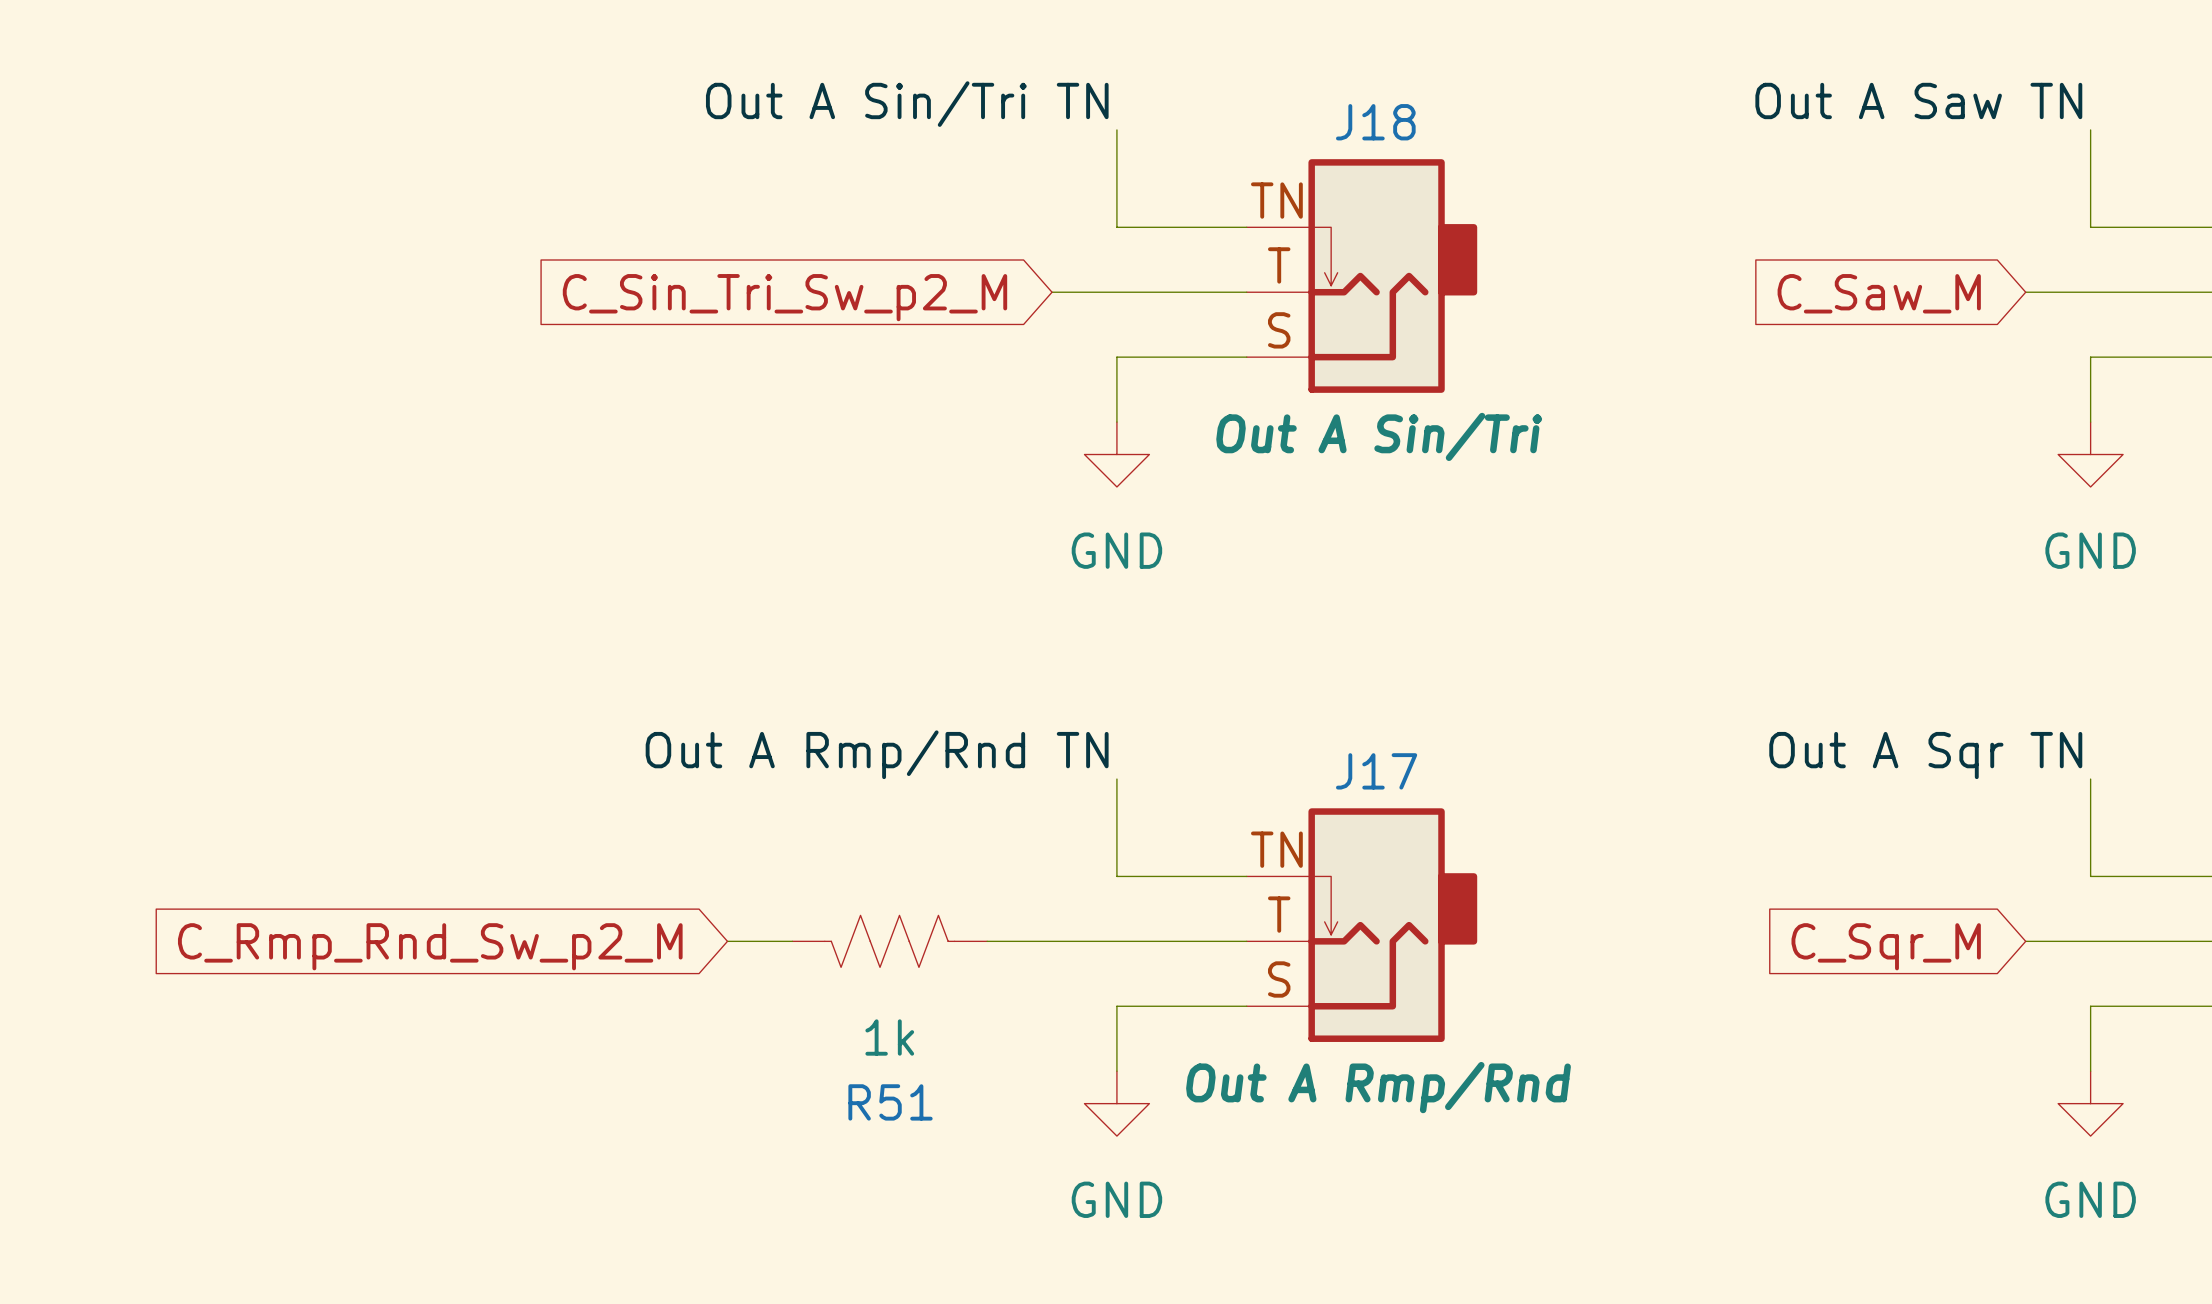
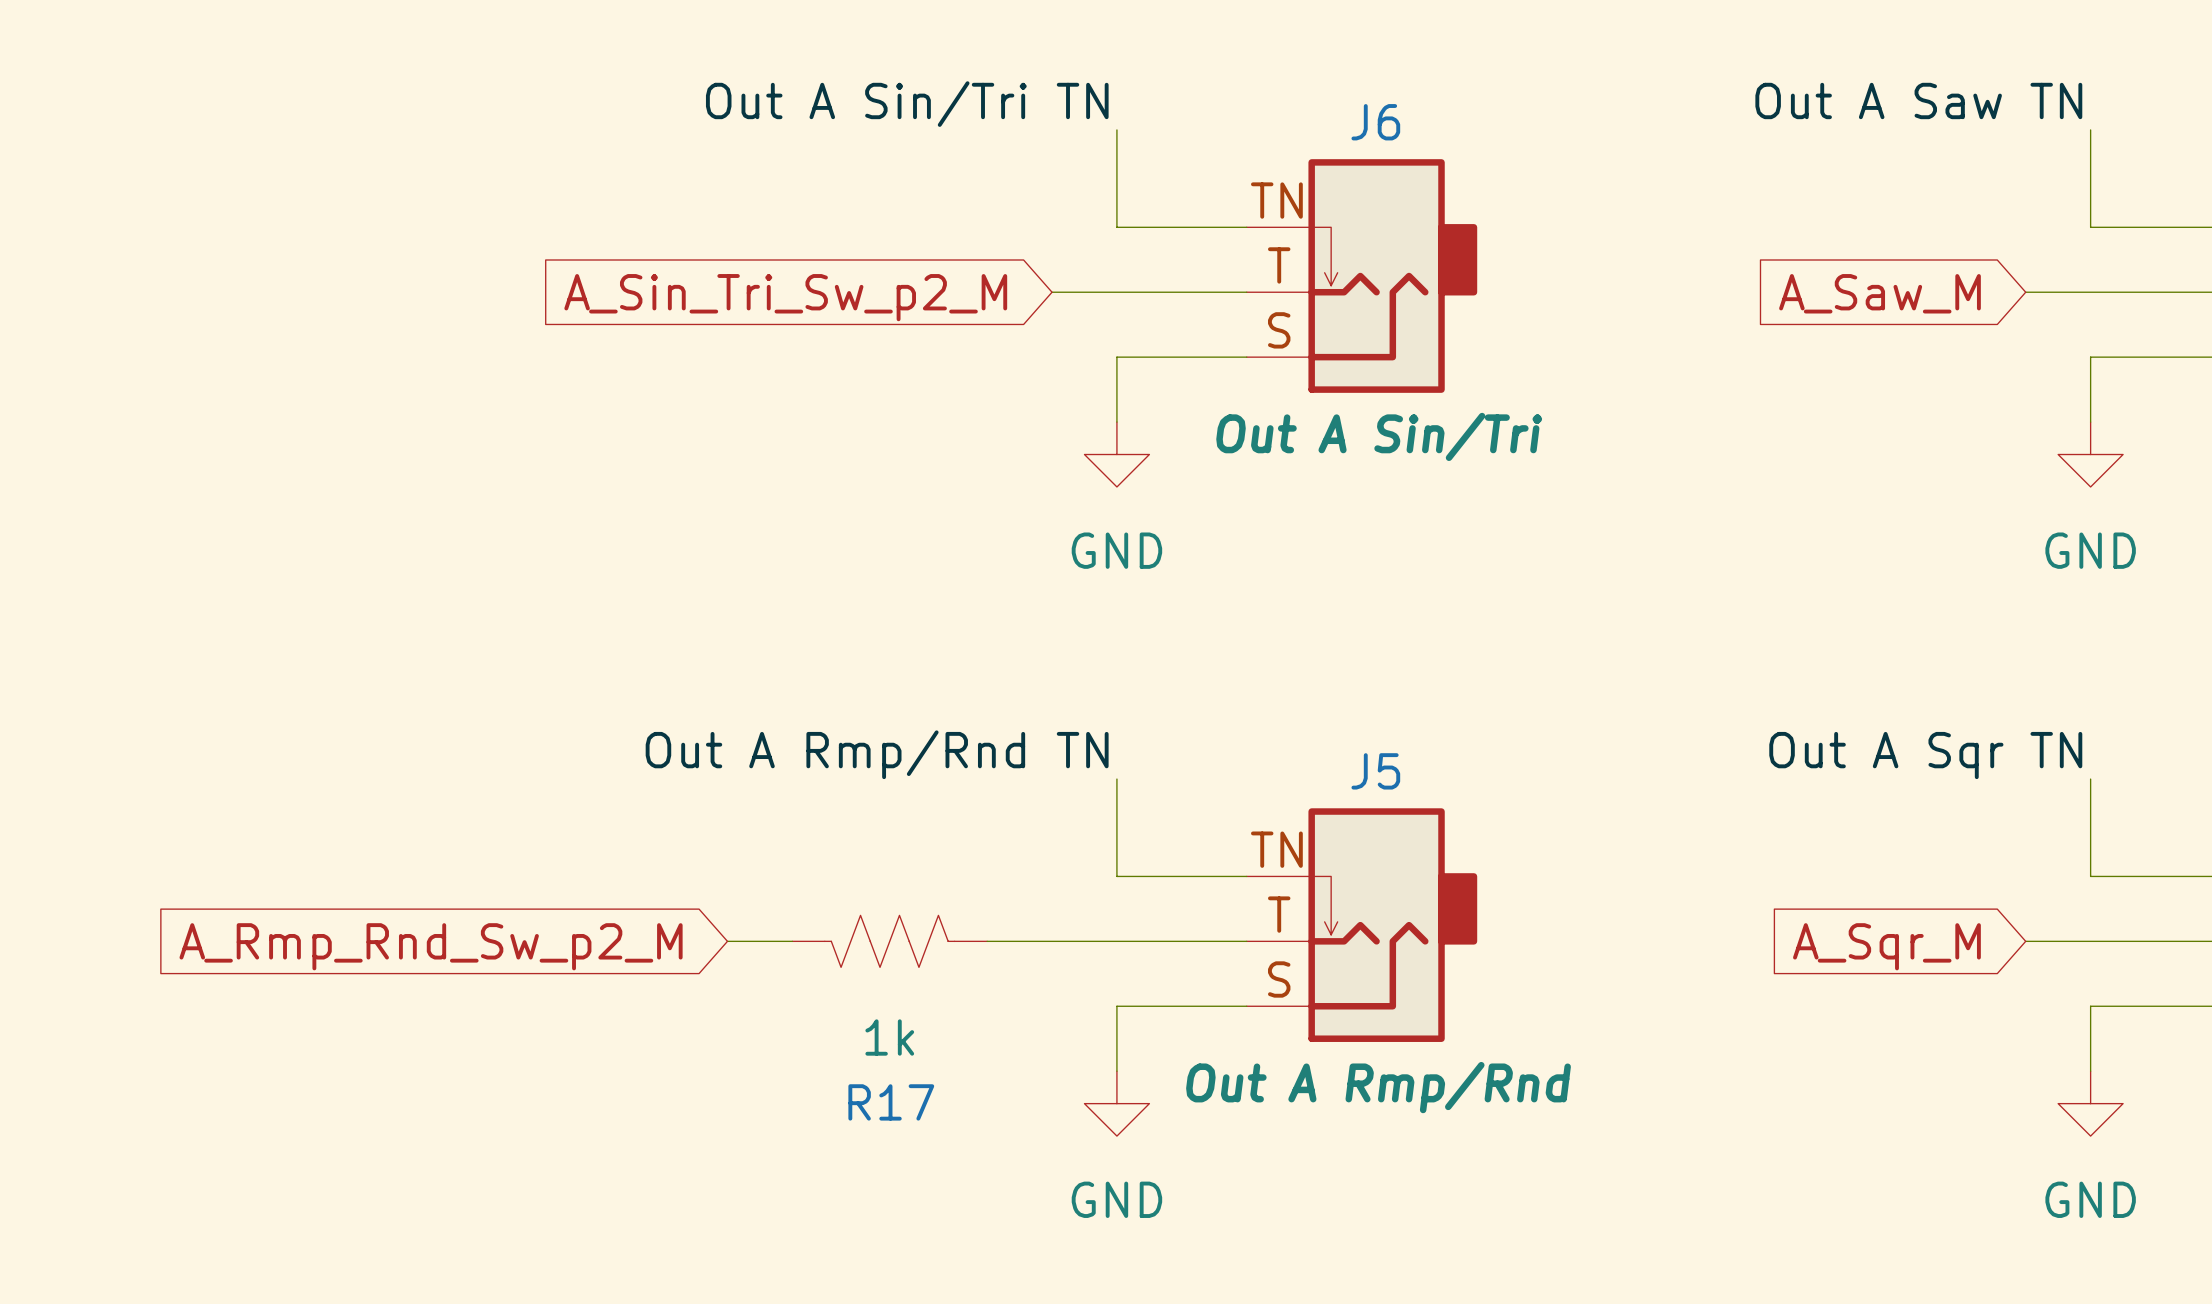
J18 name: J18 (1375, 122) -> J6 (1375, 122)
global label: C_Saw_M (1879, 293) -> A_Saw_M (1879, 293)
global label: C_Sin_Tri_Sw_p2_M (784, 297) -> A_Sin_Tri_Sw_p2_M (785, 297)
J17 name: J17 (1376, 771) -> J5 (1375, 771)
global label: C_Rmp_Rnd_Sw_p2_M (430, 946) -> A_Rmp_Rnd_Sw_p2_M (431, 946)
global label: C_Sqr_M (1886, 946) -> A_Sqr_M (1886, 946)
R51 name: R51 (890, 1102) -> R17 (891, 1102)

